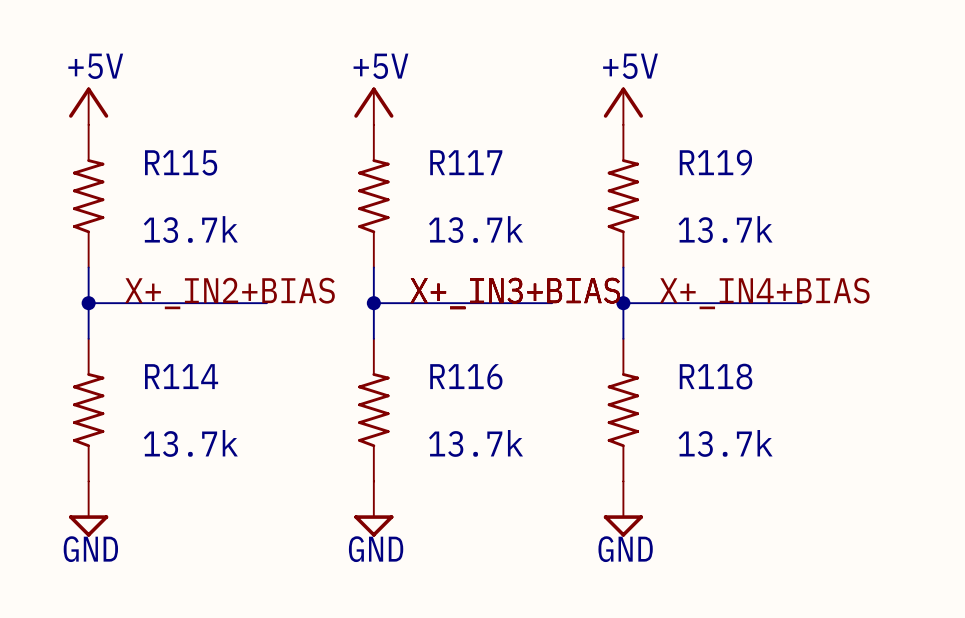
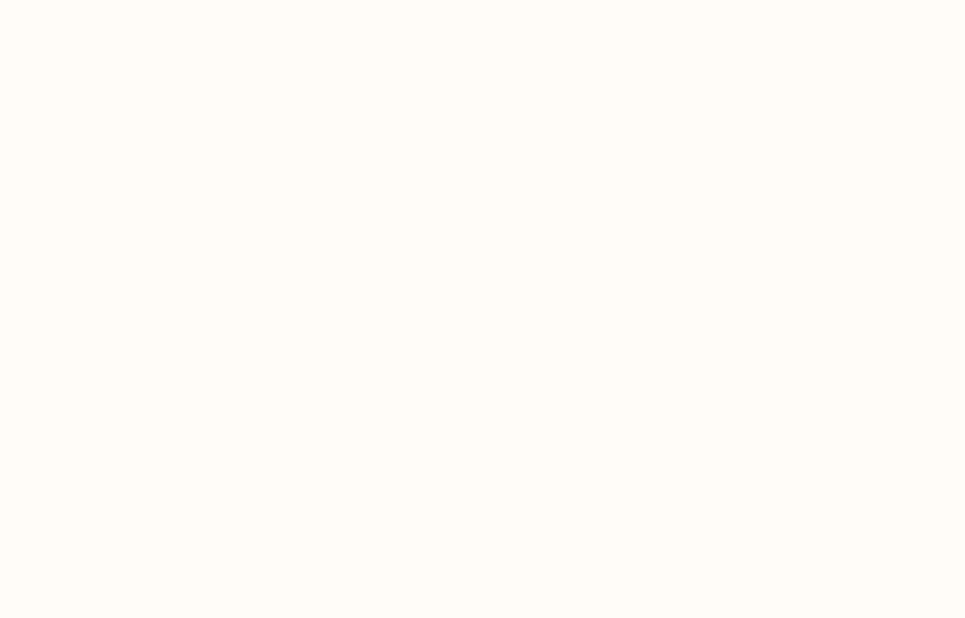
power symbol: +5V (88, 106) -> none
power symbol: +5V (373, 106) -> none
power symbol: +5V (623, 106) -> none
R115: 13.7k (88, 196) -> none
R117: 13.7k (373, 196) -> none
R119: 13.7k (623, 196) -> none
wire: (88, 267) (88, 338) -> none
wire: (373, 267) (373, 338) -> none
wire: (623, 267) (623, 338) -> none
label: X+_IN2+BIAS (229, 293) -> none
label: X+_IN3+BIAS (515, 293) -> none
label: X+_IN4+BIAS (764, 293) -> none
wire: (88, 303) (266, 303) -> none
junction: (88, 303) -> none
wire: (373, 303) (552, 303) -> none
junction: (373, 303) -> none
wire: (623, 303) (801, 303) -> none
junction: (623, 303) -> none
R114: 13.7k (88, 410) -> none
R116: 13.7k (373, 410) -> none
R118: 13.7k (623, 410) -> none
power symbol: GND (88, 509) -> none
power symbol: GND (373, 509) -> none
power symbol: GND (623, 509) -> none

